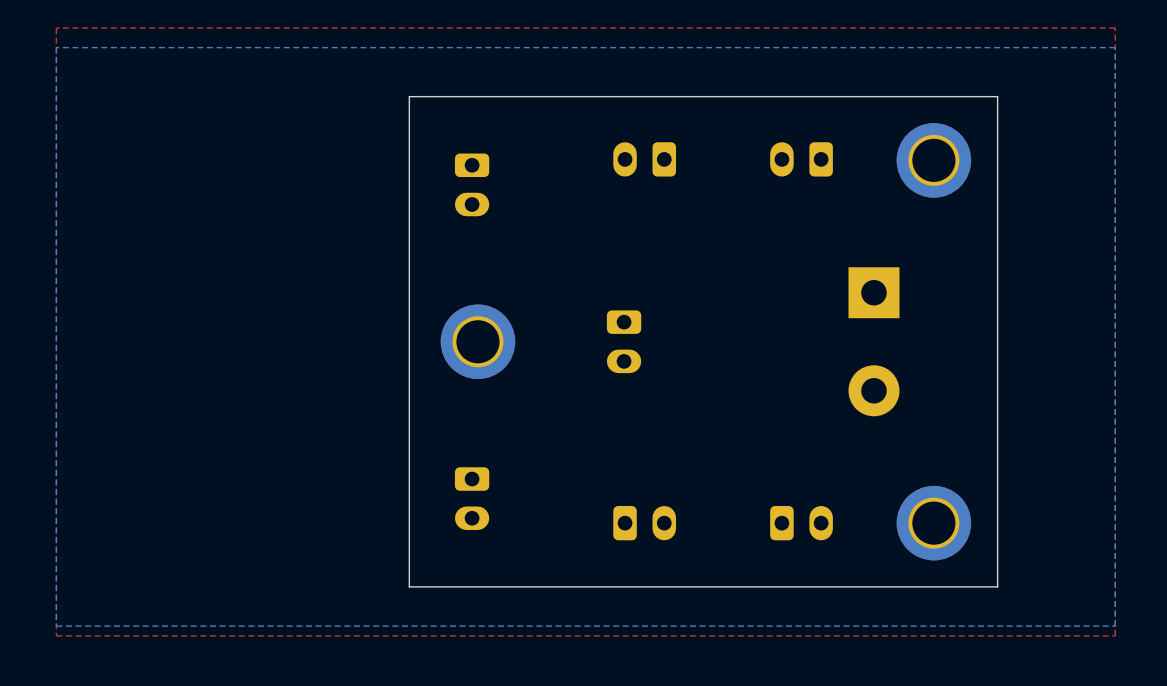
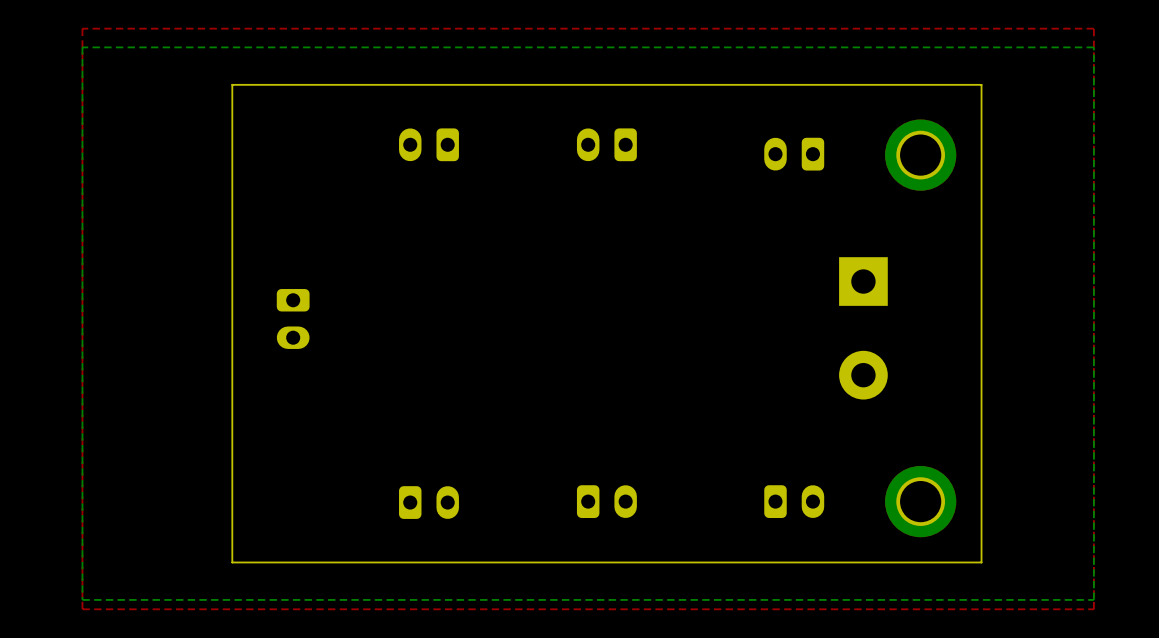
board edge: (997, 96) (409, 96) (409, 586) -> (981, 94) (981, 84) (232, 84) (232, 562) (419, 562)
part position: (644, 159) -> (606, 144)
part rotation: 0° (472, 184) -> 90° clockwise (428, 144)
part position: (472, 184) -> (428, 144)
part: none -> (293, 318)
part: (477, 341) -> none
part: (624, 341) -> none
part rotation: 0° (472, 498) -> 90° counterclockwise (428, 502)
part position: (472, 498) -> (428, 502)
part position: (644, 523) -> (606, 501)

